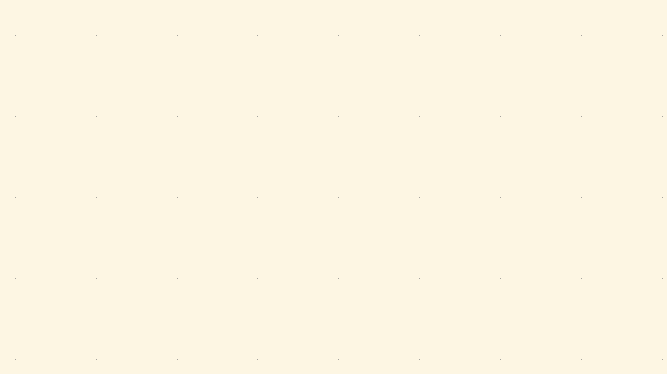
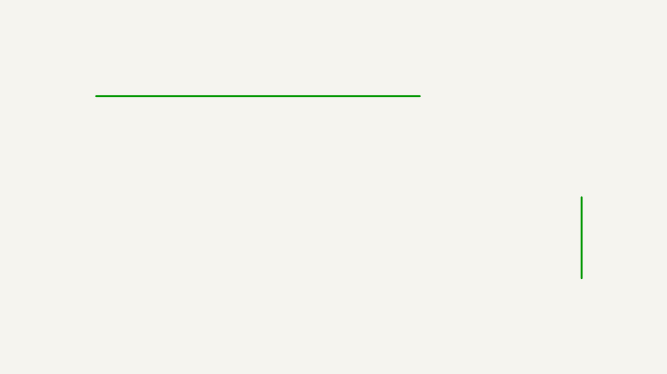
wire: none -> (96, 96) (419, 96)
wire: none -> (581, 197) (581, 278)

